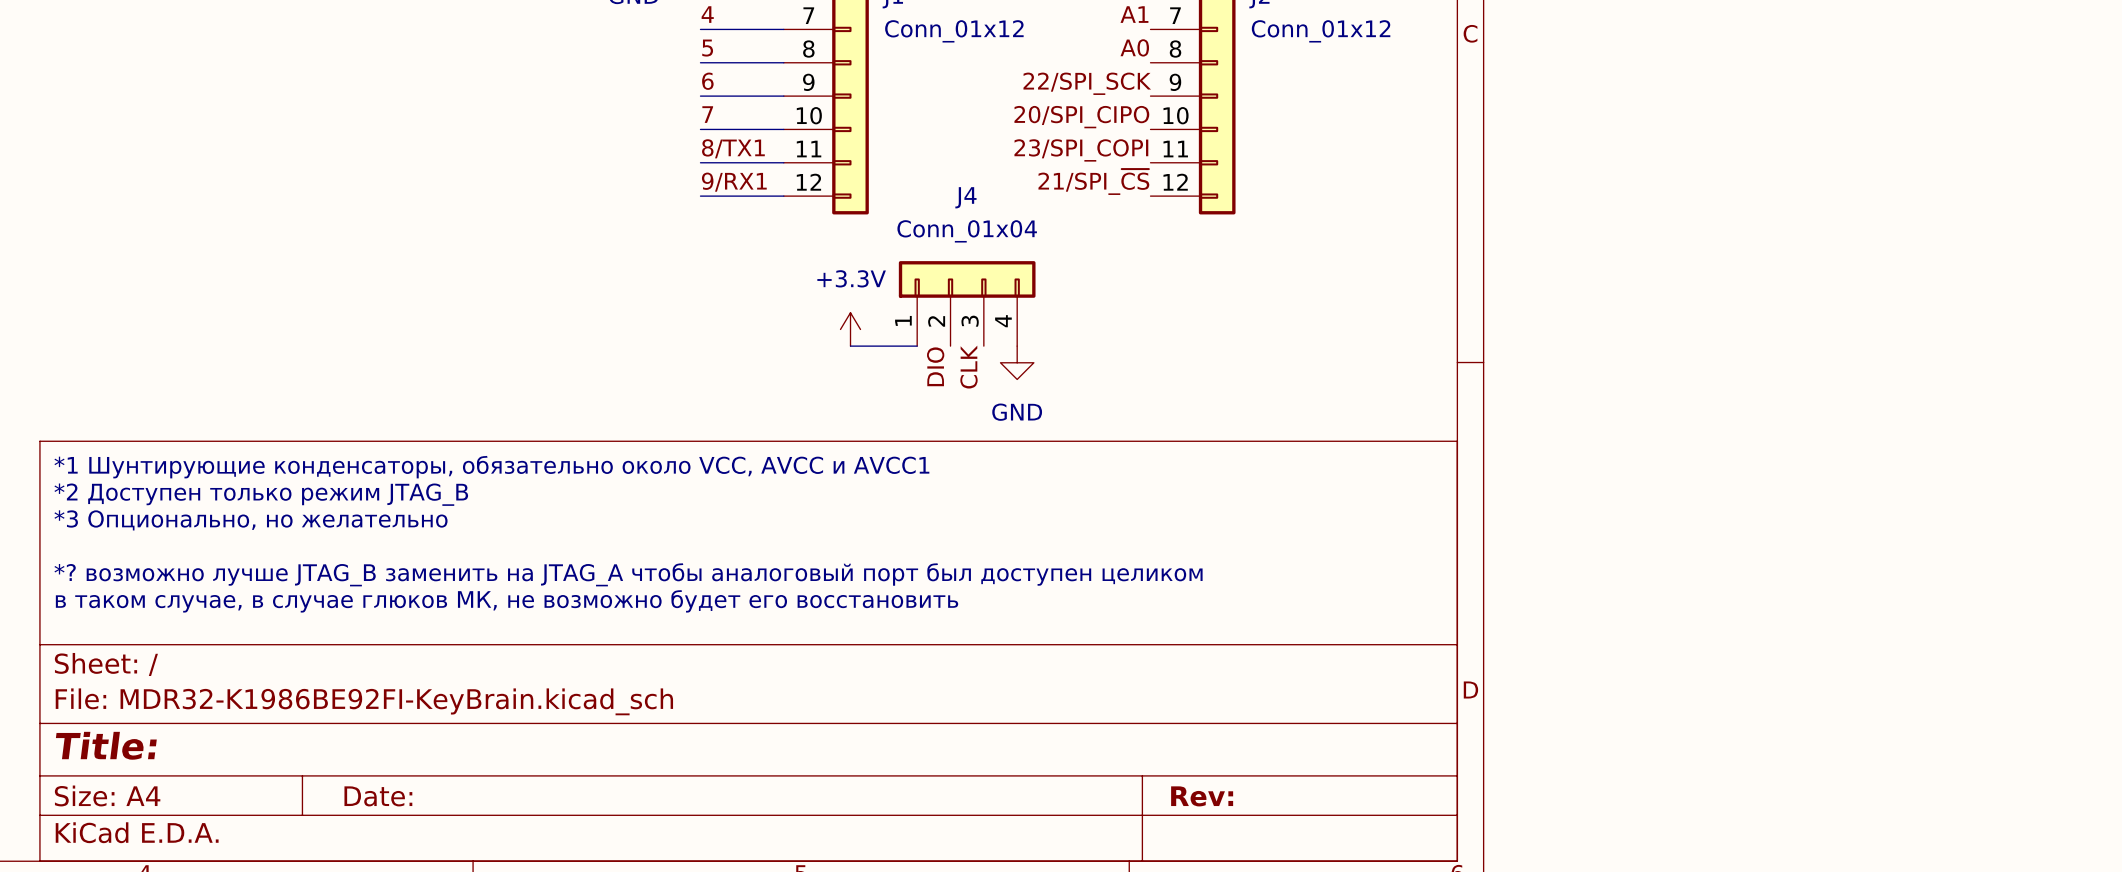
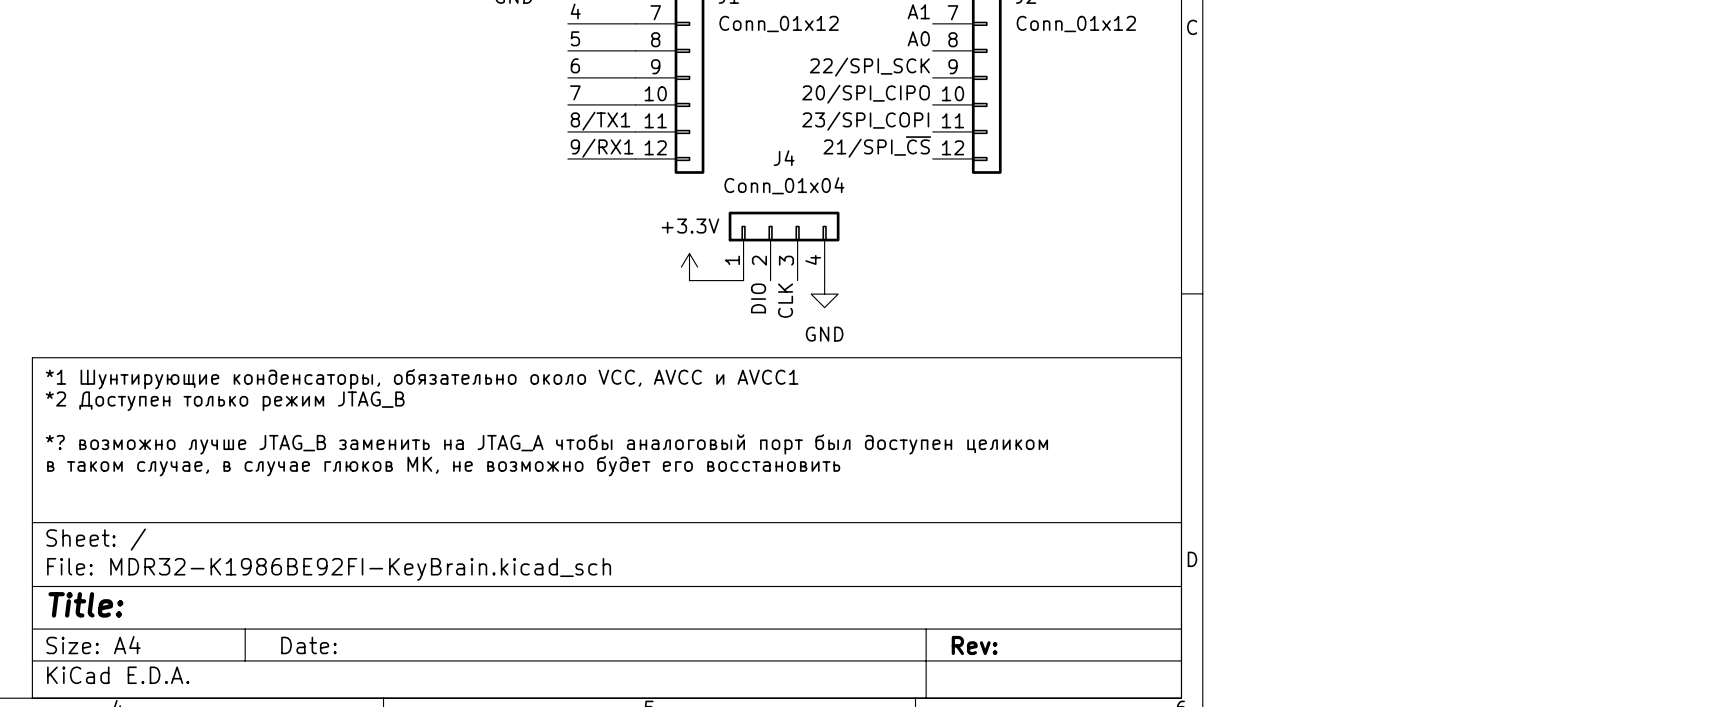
text: *3 Опционально, но желательно (251, 520) -> none
text: none -> *? возможно лучше JTAG_B заменить на JTAG_A чтобы аналоговый порт был доступен целиком (546, 444)
text: *? возможно лучше JTAG_B заменить на JTAG_A чтобы аналоговый порт был доступен целиком (628, 574) -> в таком случае, в случае глюков МК, не возможно будет его восстановить (443, 466)
text: в таком случае, в случае глюков МК, не возможно будет его восстановить (507, 601) -> none

